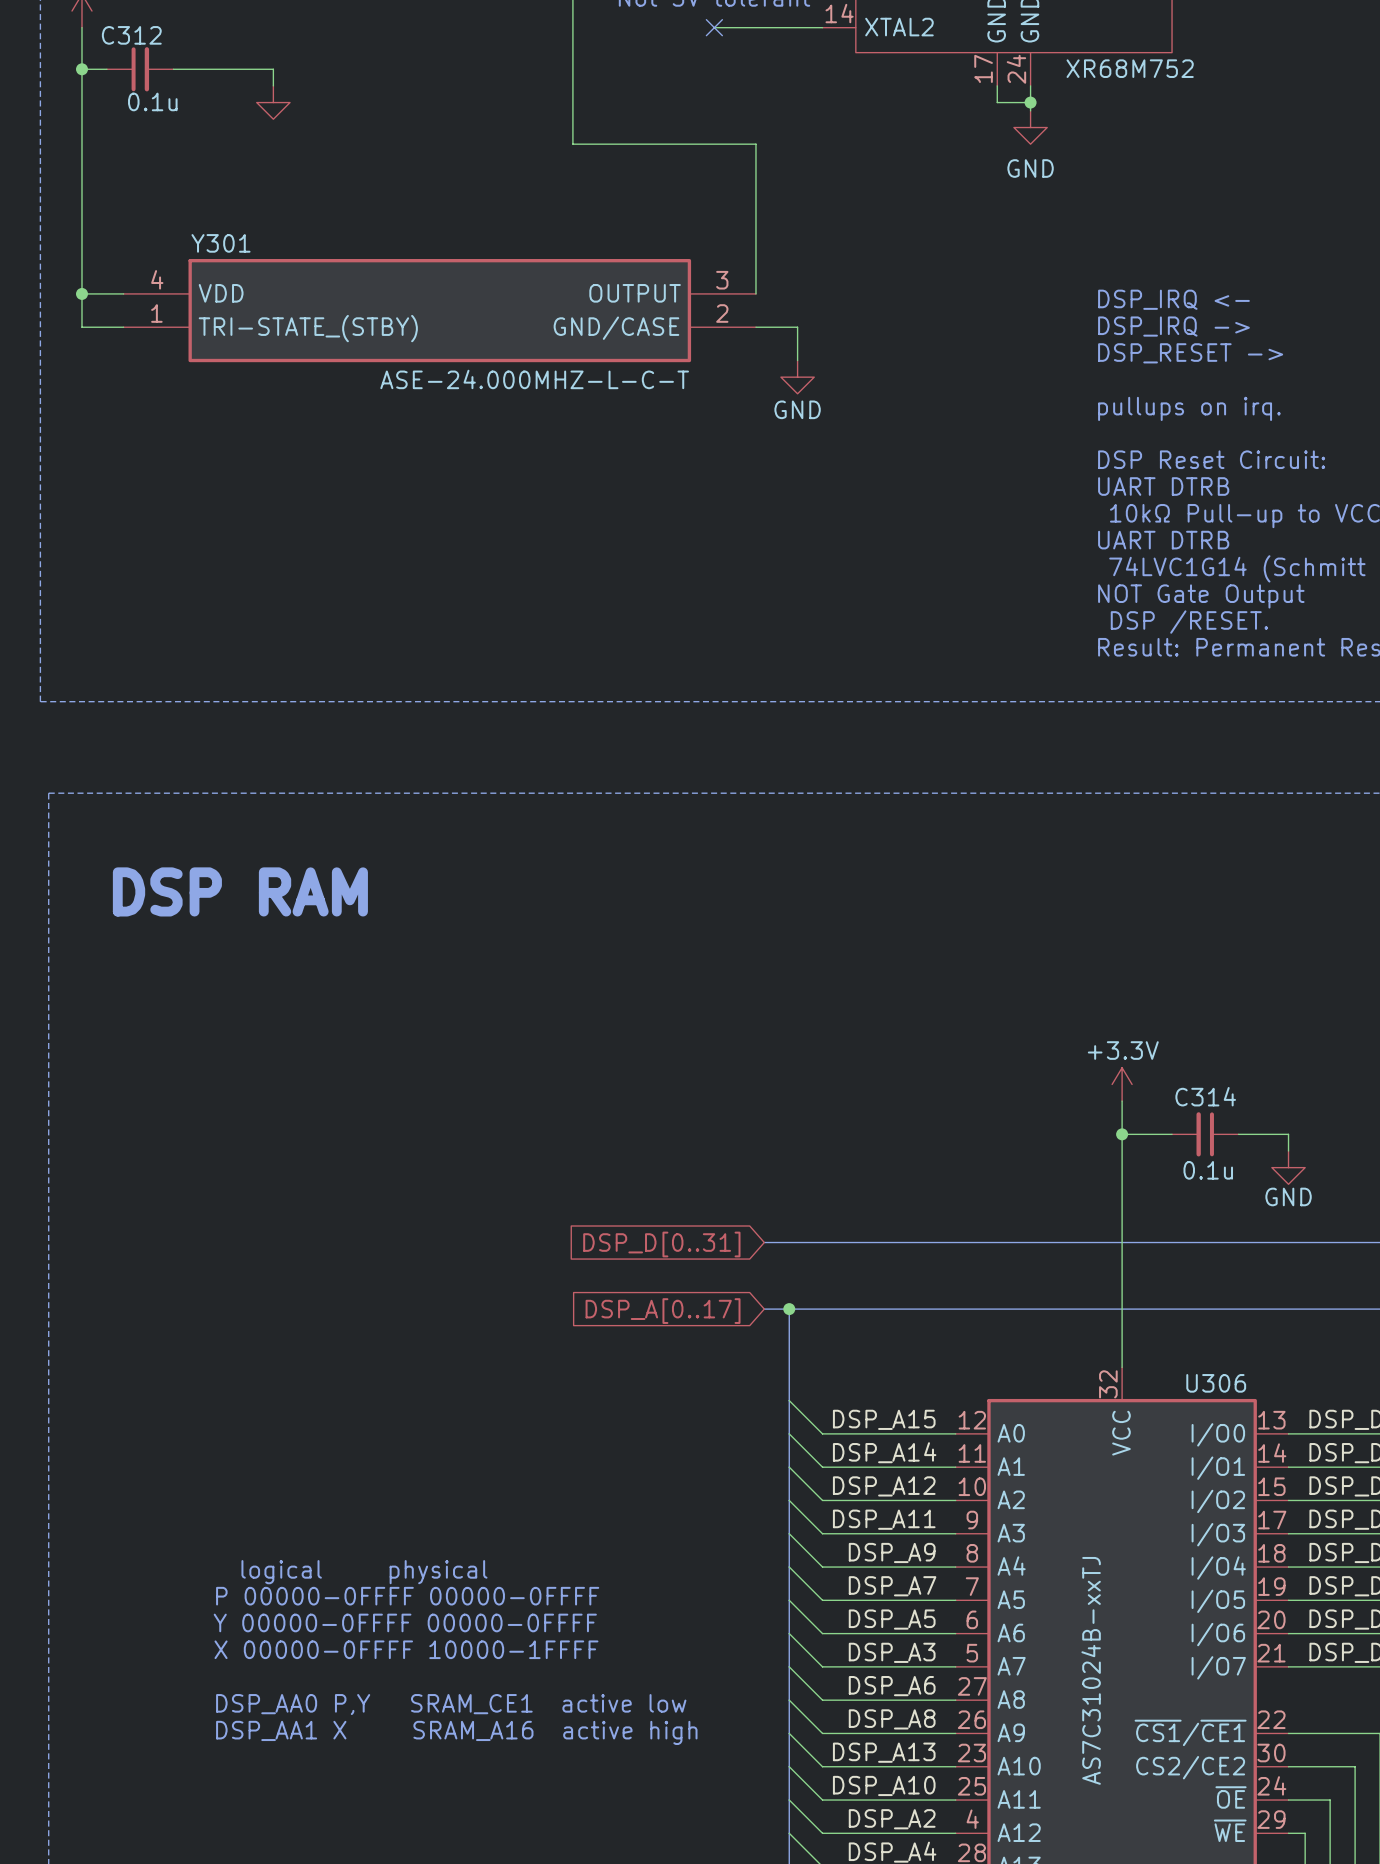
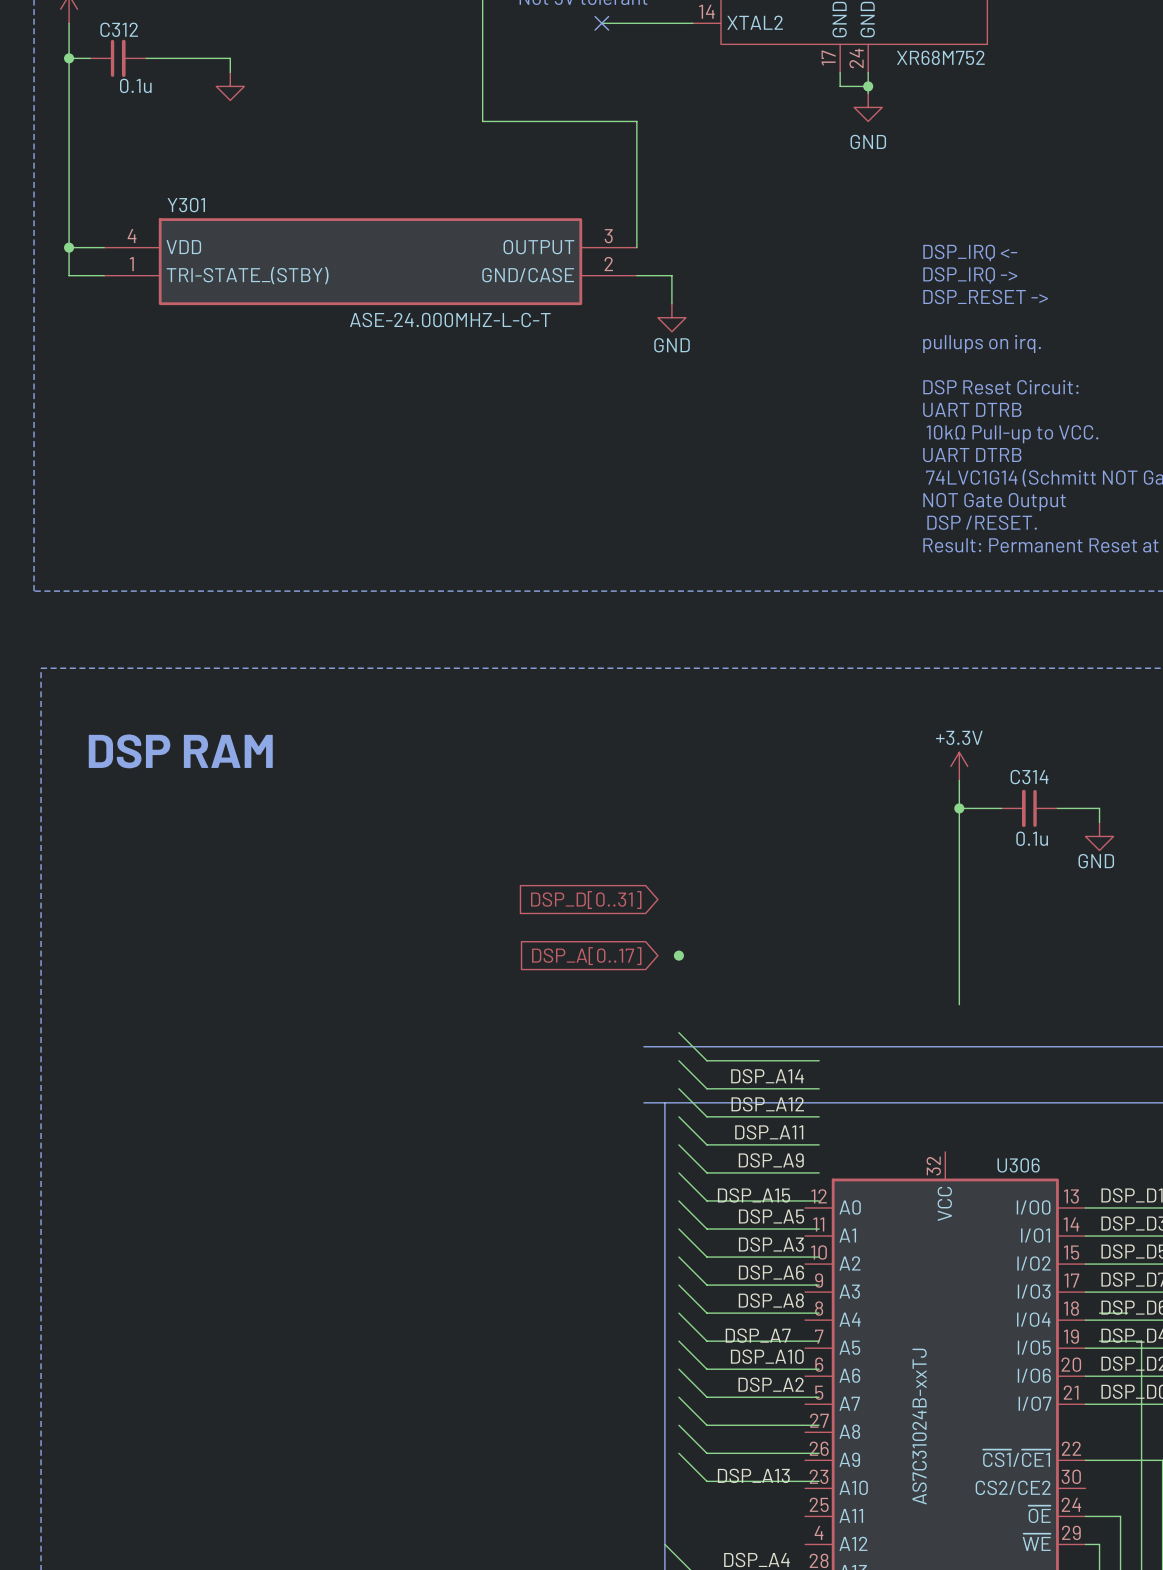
junction: none -> (959, 808)
power symbol position: +3.3V (1122, 1084) -> +3.3V (959, 766)
wire: (1122, 1101) (1122, 1367) -> (959, 780) (959, 1004)
junction: none -> (678, 955)
wire: (1122, 1134) (1172, 1134) -> (959, 808) (1001, 808)
junction: (1122, 1134) -> none
C314 position: (1205, 1134) -> (1029, 808)
wire: (1238, 1134) (1288, 1134) (1288, 1150) -> (1057, 808) (1099, 808) (1099, 822)
power symbol position: GND (1288, 1167) -> GND (1099, 836)
wire: none -> (678, 1032) (706, 1060) (819, 1060)
global label position: DSP_D[0..31] (661, 1244) -> DSP_D[0..31] (586, 900)
wire: none -> (678, 1060) (706, 1088) (819, 1088)
wire: none -> (678, 1088) (706, 1116) (819, 1116)
junction: (789, 1309) -> none
global label position: DSP_A[0..17] (663, 1311) -> DSP_A[0..17] (586, 956)
wire: none -> (678, 1116) (706, 1144) (819, 1144)
wire: none -> (678, 1144) (706, 1172) (819, 1172)
wire: none -> (678, 1172) (706, 1200) (819, 1200)
wire: (789, 1400) (822, 1433) -> none
wire: none -> (678, 1200) (706, 1229) (819, 1229)
wire: (789, 1433) (822, 1467) -> none
wire: (822, 1433) (955, 1433) -> none
label position: DSP_A14 (884, 1452) -> DSP_A14 (767, 1076)
wire: none -> (678, 1229) (706, 1257) (819, 1257)
wire: (789, 1467) (822, 1500) -> none
wire: (822, 1467) (955, 1467) -> none
label position: DSP_A12 (884, 1486) -> DSP_A12 (767, 1104)
wire: none -> (678, 1257) (706, 1285) (819, 1285)
wire: (789, 1500) (822, 1533) -> none
wire: (822, 1500) (955, 1500) -> none
label position: DSP_A11 (884, 1519) -> DSP_A11 (769, 1132)
wire: none -> (678, 1285) (706, 1313) (819, 1313)
wire: (789, 1533) (822, 1567) -> none
wire: (822, 1533) (955, 1533) -> none
label position: DSP_A9 (892, 1552) -> DSP_A9 (771, 1160)
wire: none -> (678, 1313) (706, 1341) (819, 1341)
wire: none -> (1099, 1313) (1127, 1313)
wire: (789, 1567) (822, 1600) -> none
wire: (822, 1567) (955, 1567) -> none
text: logical physical (364, 1572) -> none
wire: none -> (678, 1341) (706, 1369) (819, 1369)
text: P 00000-0FFFF 00000-0FFFF (407, 1596) -> none
wire: (789, 1600) (822, 1633) -> none
wire: (822, 1600) (955, 1600) -> none
label position: DSP_A5 (892, 1619) -> DSP_A5 (771, 1216)
text: Y 00000-0FFFF 00000-0FFFF (405, 1622) -> none
wire: none -> (678, 1369) (706, 1397) (819, 1397)
wire: (789, 1633) (822, 1666) -> none
wire: (822, 1633) (955, 1633) -> none
text: X 00000-0FFFF 10000-1FFFF (406, 1649) -> none
label position: DSP_A3 (892, 1652) -> DSP_A3 (771, 1244)
wire: none -> (678, 1397) (706, 1425) (819, 1425)
wire: (789, 1666) (822, 1700) -> none
wire: (822, 1666) (955, 1666) -> none
label position: DSP_A6 (892, 1686) -> DSP_A6 (771, 1272)
wire: none -> (678, 1425) (706, 1453) (819, 1453)
wire: (789, 1700) (822, 1733) -> none
wire: (822, 1700) (955, 1700) -> none
text: DSP_AA0 P,Y SRAM_CE1 active low (451, 1704) -> none
label position: DSP_A8 (892, 1719) -> DSP_A8 (771, 1300)
wire: none -> (678, 1453) (706, 1481) (819, 1481)
text: DSP_AA1 X SRAM_A16 active high (456, 1732) -> none
wire: (789, 1733) (822, 1766) -> none
wire: (822, 1733) (955, 1733) -> none
wire: (789, 1766) (822, 1800) -> none
wire: (822, 1766) (955, 1766) -> none
wire: (1288, 1766) (1355, 1766) -> (1099, 1341) (1141, 1341) (1141, 1488)
label position: DSP_A10 (884, 1785) -> DSP_A10 (767, 1356)
wire: (789, 1800) (822, 1833) -> none
wire: (822, 1800) (955, 1800) -> none
label position: DSP_A2 (892, 1819) -> DSP_A2 (771, 1384)
wire: (822, 1833) (955, 1833) -> none

